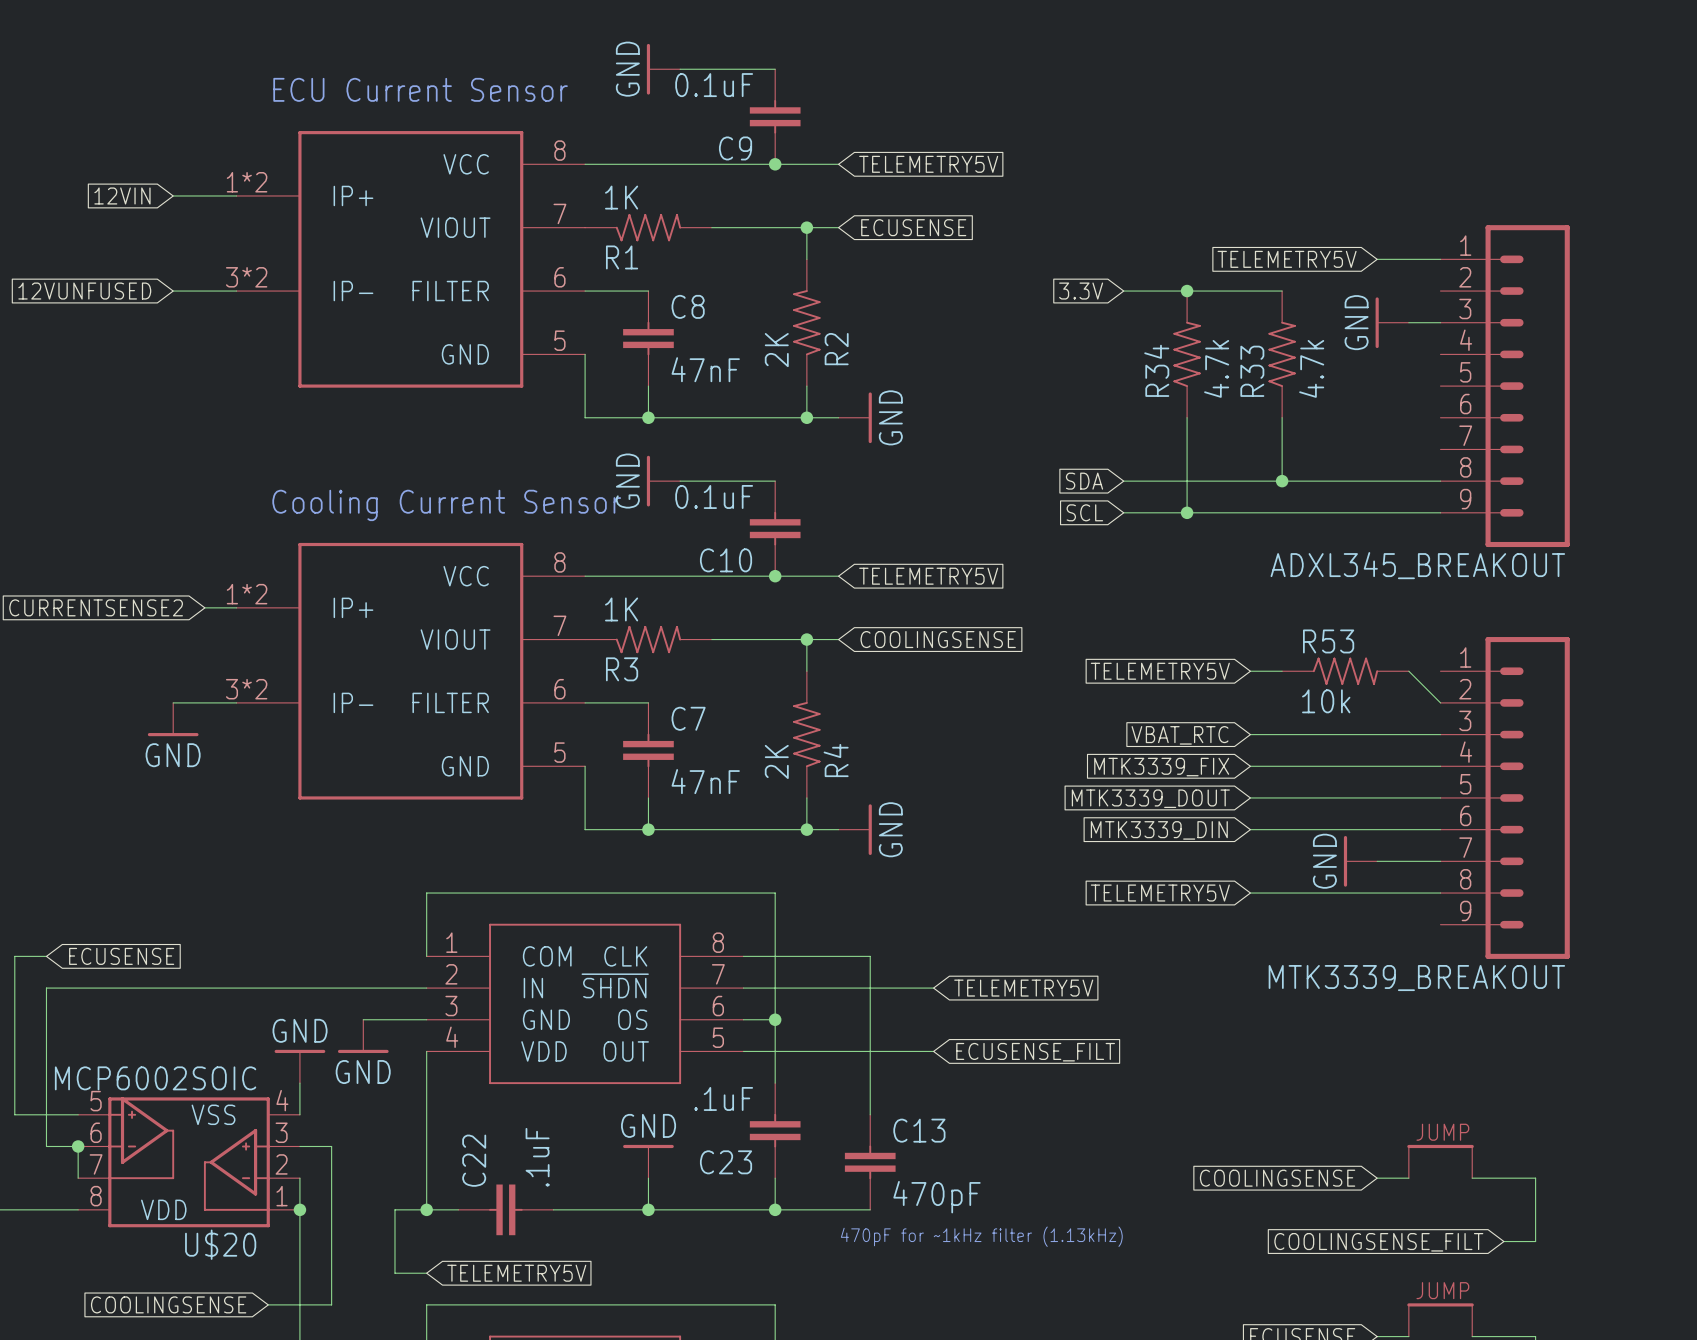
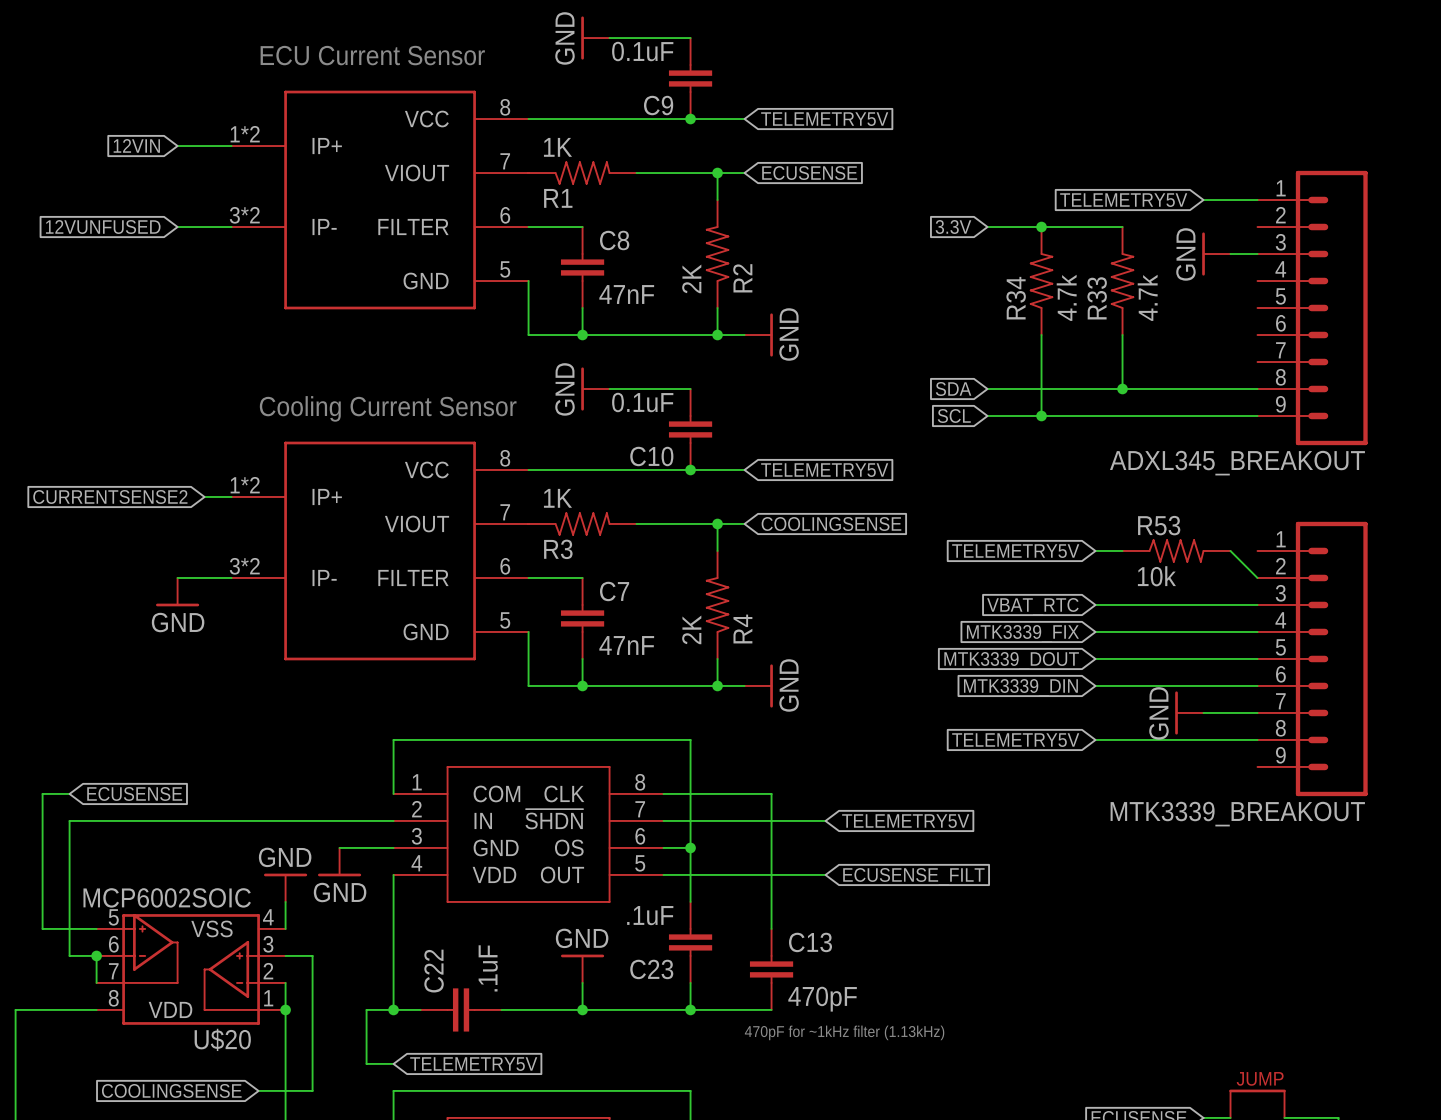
part: (1440, 1161) -> none
global label: COOLINGSENSE (1277, 1178) -> none
wire: (1377, 1178) (1408, 1178) -> none
wire: (1472, 1178) (1535, 1178) (1535, 1241) (1503, 1241) -> none
global label: COOLINGSENSE_FILT (1378, 1242) -> none

